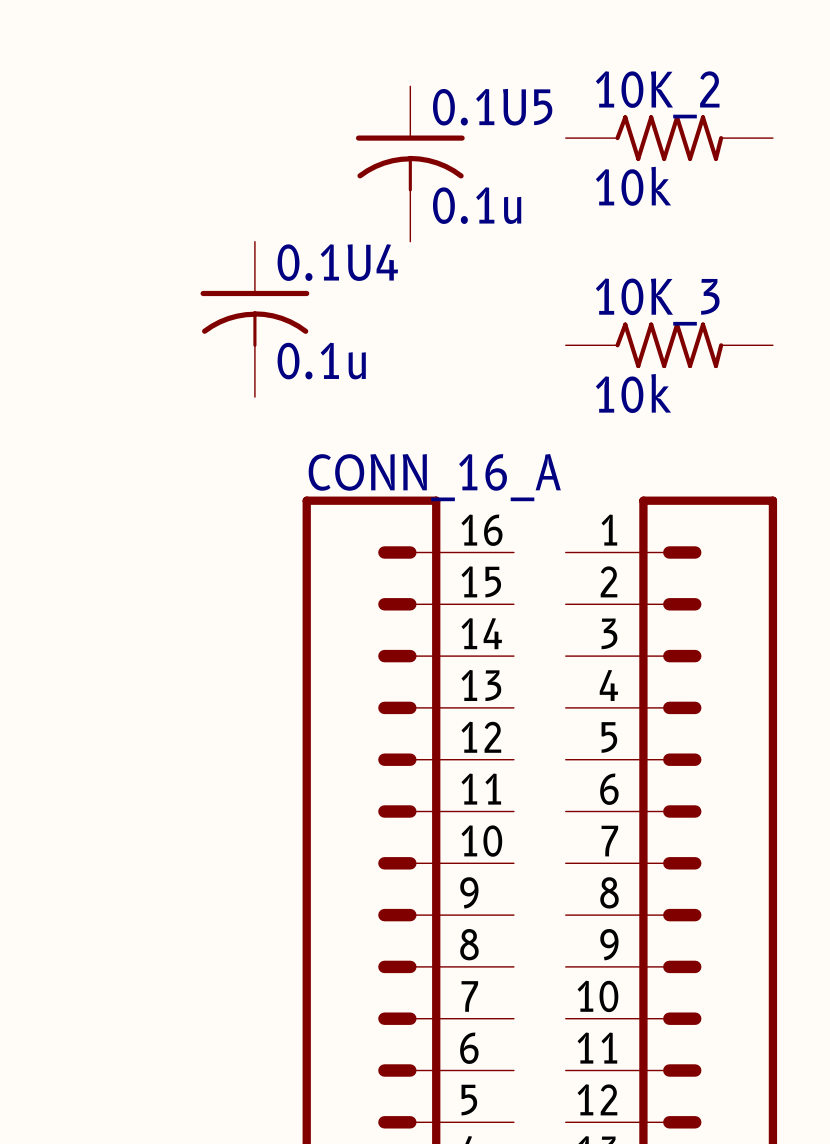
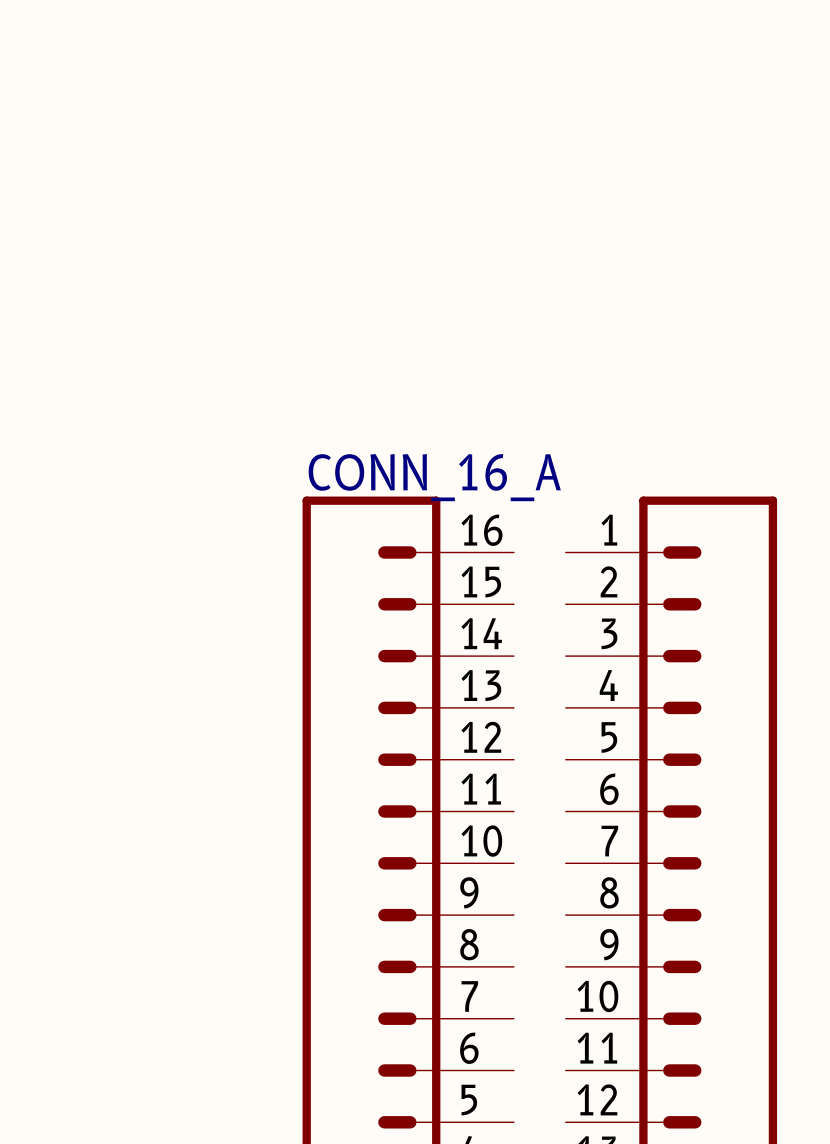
10K_2: 10k (669, 138) -> none
0.1U5: 0.1u (410, 163) -> none
0.1U4: 0.1u (254, 319) -> none
10K_3: 10k (669, 345) -> none

